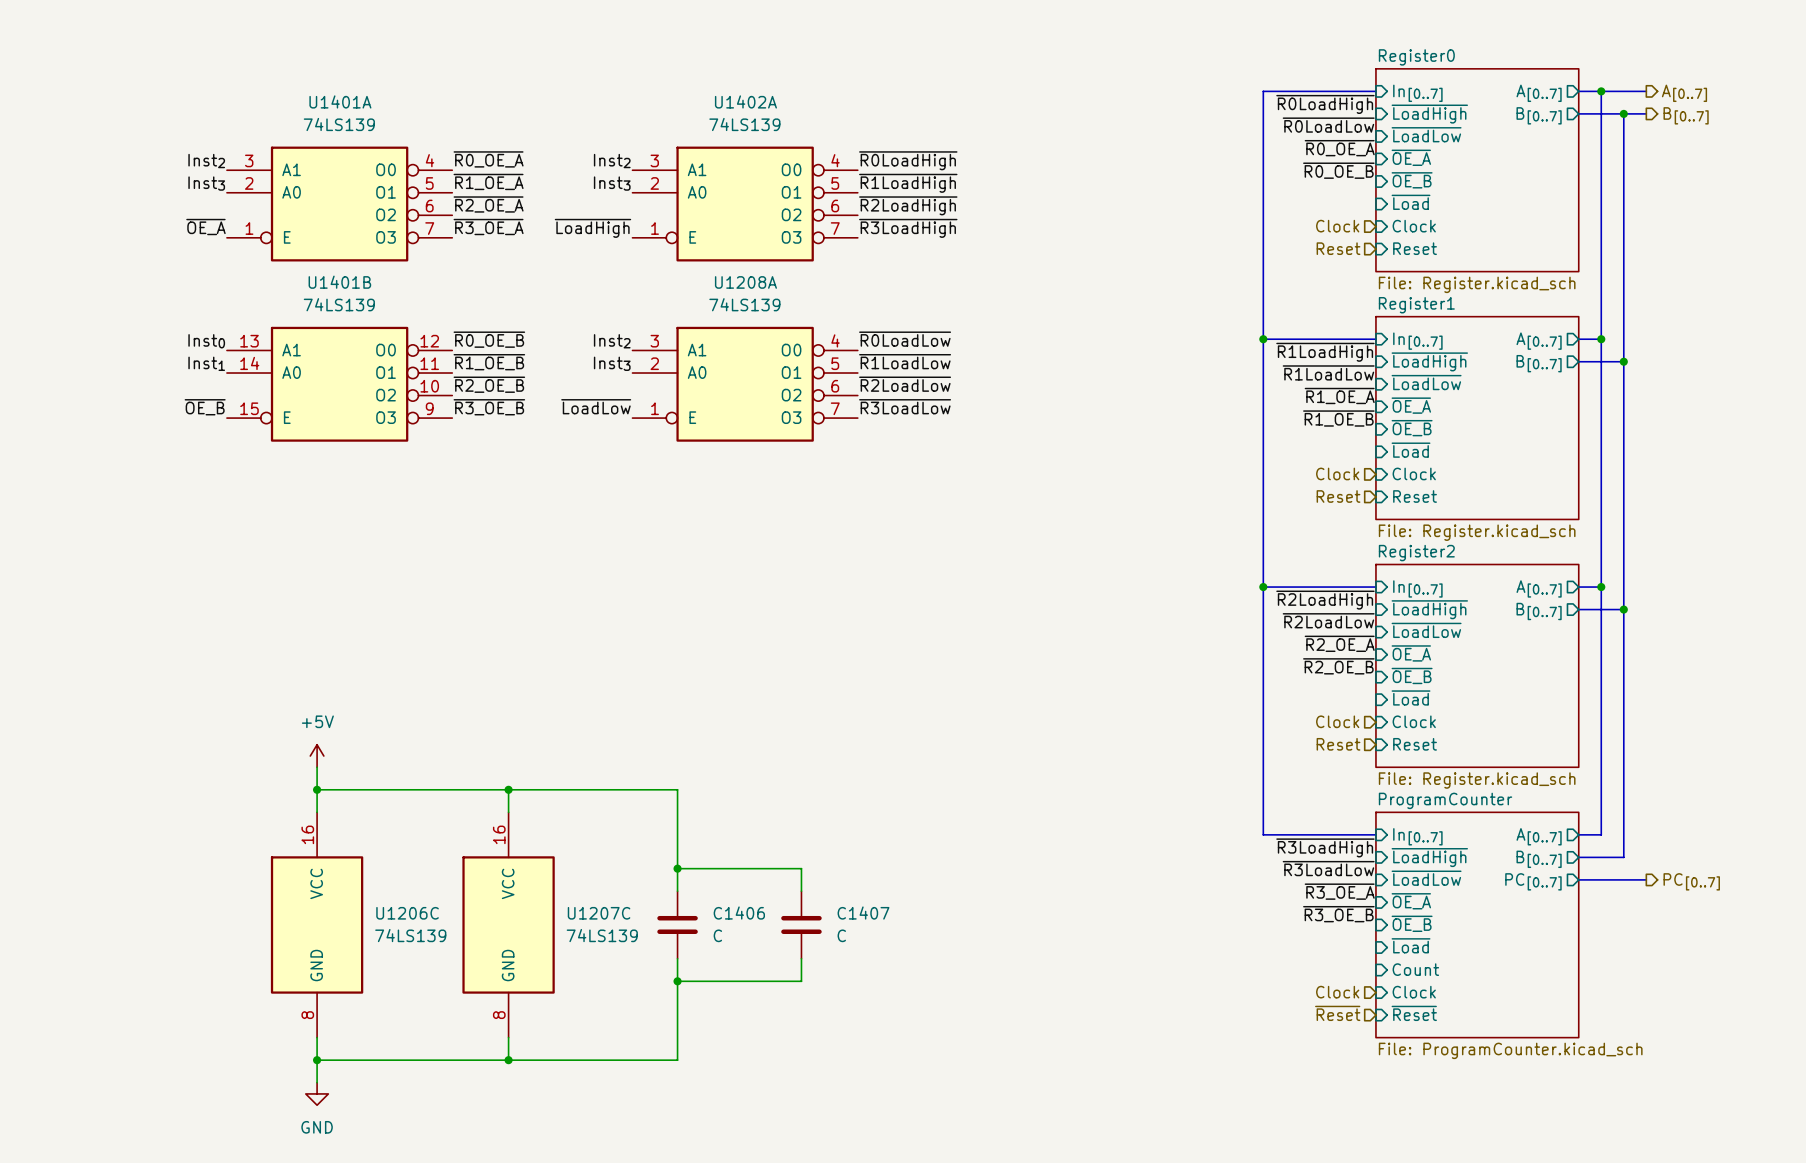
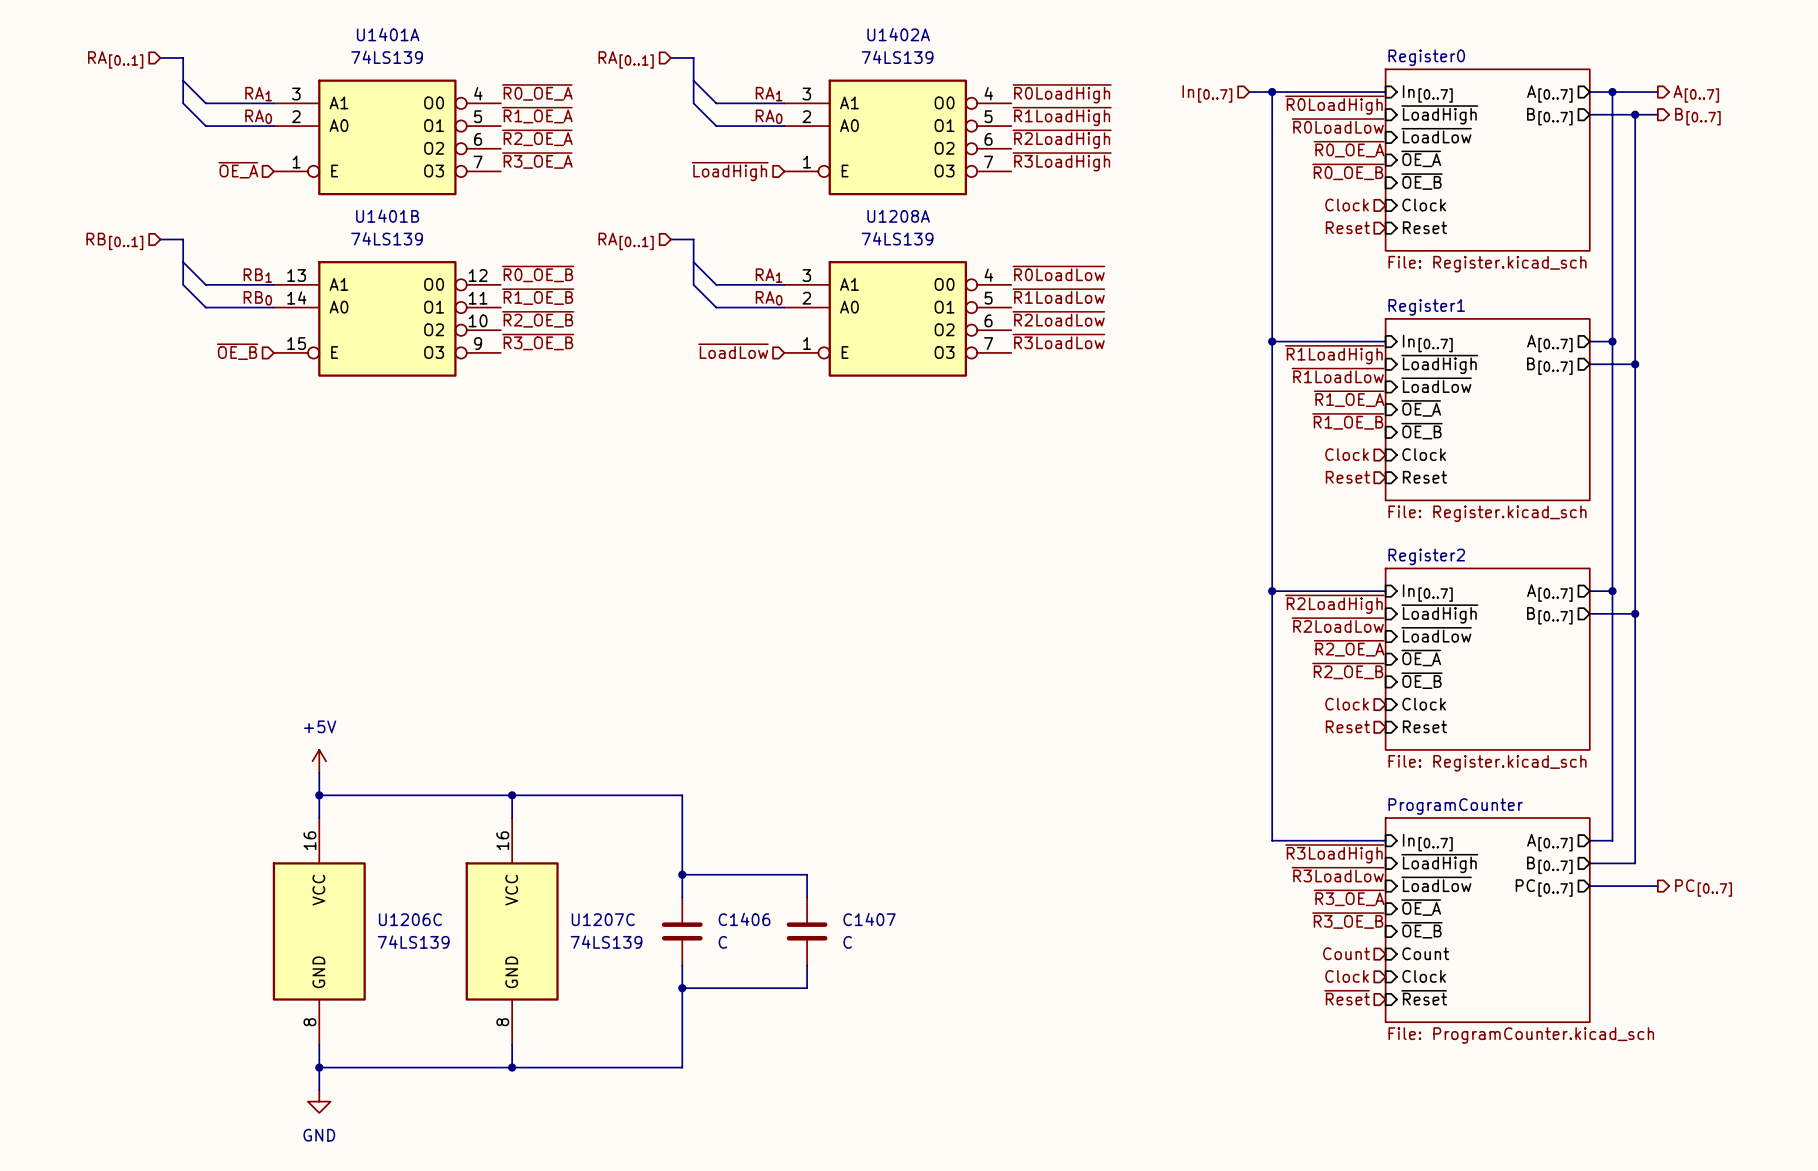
bus: none -> (160, 57) (183, 57) (183, 103)
bus: none -> (670, 57) (693, 57) (693, 103)
hierarchical label: none -> RA[0..1] (115, 59)
hierarchical label: none -> RA[0..1] (626, 59)
sheet Register0 shape: [1375, 68, 1580, 273] -> [1384, 68, 1591, 252]
wire: none -> (183, 80) (205, 103) (273, 103)
wire: none -> (693, 80) (716, 103) (784, 103)
bus: none -> (1249, 92) (1272, 92)
junction: none -> (1272, 92)
label: none -> RA1 (258, 94)
label: none -> RA1 (769, 94)
hierarchical label: none -> In[0..7] (1207, 93)
wire: none -> (183, 103) (205, 126) (273, 126)
wire: none -> (693, 103) (716, 126) (784, 126)
label: none -> RA0 (258, 116)
label: none -> RA0 (769, 116)
label position: ~{R0_OE_A} (488, 159) -> ~{R0_OE_A} (537, 92)
label position: ~{R0LoadHigh} (908, 160) -> ~{R0LoadHigh} (1062, 93)
label: Inst2 (206, 161) -> none
label: Inst2 (612, 161) -> none
hierarchical label: none -> ~{OE_A} (238, 170)
hierarchical label: none -> ~{LoadHigh} (730, 171)
label position: ~{R1_OE_A} (488, 181) -> ~{R1_OE_A} (537, 115)
label: Inst3 (206, 183) -> none
label: Inst3 (612, 183) -> none
label position: ~{R1LoadHigh} (908, 183) -> ~{R1LoadHigh} (1062, 116)
sheet pin: ~{Load} (1411, 202) -> Clock (1424, 205)
hierarchical label: none -> Clock (1347, 205)
U1401A position: (339, 204) -> (387, 137)
label position: ~{R2_OE_A} (488, 204) -> ~{R2_OE_A} (537, 137)
U1402A position: (745, 204) -> (897, 137)
label position: ~{R2LoadHigh} (908, 205) -> ~{R2LoadHigh} (1062, 139)
hierarchical label: Clock (1337, 226) -> Reset (1347, 227)
sheet pin: Clock (1414, 226) -> Reset (1424, 227)
label: ~{OE_A} (205, 227) -> none
label position: ~{R3_OE_A} (488, 227) -> ~{R3_OE_A} (537, 160)
label: ~{LoadHigh} (592, 228) -> none
label position: ~{R3LoadHigh} (908, 228) -> ~{R3LoadHigh} (1062, 161)
bus: none -> (160, 239) (183, 239) (183, 284)
bus: none -> (670, 239) (693, 239) (693, 284)
hierarchical label: none -> RB[0..1] (114, 241)
hierarchical label: none -> RA[0..1] (626, 241)
hierarchical label: Reset (1338, 248) -> none
sheet pin: Reset (1415, 248) -> none
wire: none -> (183, 262) (205, 284) (273, 284)
wire: none -> (693, 262) (716, 284) (784, 284)
label: none -> RB1 (257, 275)
label: none -> RA1 (769, 275)
wire: none -> (183, 284) (205, 307) (273, 307)
wire: none -> (693, 284) (716, 307) (784, 307)
label: none -> RB0 (257, 298)
label: none -> RA0 (769, 298)
sheet Register1 shape: [1375, 316, 1580, 521] -> [1384, 318, 1591, 502]
label position: ~{R0_OE_B} (489, 339) -> ~{R0_OE_B} (538, 273)
label position: ~{R0LoadLow} (905, 339) -> ~{R0LoadLow} (1058, 273)
label: Inst0 (206, 341) -> none
label: Inst2 (612, 341) -> none
hierarchical label: none -> ~{LoadLow} (733, 351)
hierarchical label: none -> ~{OE_B} (237, 351)
label position: ~{R1LoadLow} (905, 361) -> ~{R1LoadLow} (1058, 296)
label position: ~{R1_OE_B} (489, 362) -> ~{R1_OE_B} (538, 296)
label: Inst1 (206, 363) -> none
label: Inst3 (612, 363) -> none
U1401B position: (339, 384) -> (387, 318)
label position: ~{R2_OE_B} (489, 384) -> ~{R2_OE_B} (538, 319)
U1208A position: (745, 384) -> (897, 318)
label position: ~{R2LoadLow} (905, 384) -> ~{R2LoadLow} (1058, 318)
label: ~{LoadLow} (596, 406) -> none
label position: ~{R3LoadLow} (905, 406) -> ~{R3LoadLow} (1058, 341)
label: ~{OE_B} (205, 407) -> none
label position: ~{R3_OE_B} (489, 407) -> ~{R3_OE_B} (538, 342)
sheet pin: ~{Load} (1411, 450) -> Clock (1424, 454)
hierarchical label: none -> Clock (1347, 454)
hierarchical label: Clock (1337, 473) -> Reset (1347, 477)
sheet pin: Clock (1414, 473) -> Reset (1424, 477)
hierarchical label: Reset (1338, 496) -> none
sheet pin: Reset (1415, 496) -> none
sheet Register2 shape: [1375, 563, 1580, 768] -> [1384, 567, 1591, 751]
sheet pin: ~{Load} (1411, 697) -> Clock (1424, 704)
hierarchical label: none -> Clock (1347, 704)
hierarchical label: Clock (1337, 721) -> Reset (1347, 726)
sheet pin: Clock (1414, 721) -> Reset (1424, 726)
hierarchical label: Reset (1338, 744) -> none
sheet pin: Reset (1415, 744) -> none
sheet ProgramCounter: none -> File: ProgramCounter.kicad_sch (1487, 920)
sheet ProgramCounter: File: ProgramCounter.kicad_sch (1477, 924) -> none
sheet pin: ~{Load} (1411, 945) -> Count (1425, 953)
hierarchical label: none -> Count (1346, 953)
hierarchical label: none -> Clock (1347, 976)
sheet pin: Count (1415, 969) -> Clock (1424, 976)
hierarchical label: Clock (1337, 992) -> ~{Reset} (1347, 997)
sheet pin: Clock (1414, 992) -> ~{Reset} (1424, 997)
hierarchical label: ~{Reset} (1337, 1013) -> none
sheet pin: ~{Reset} (1414, 1013) -> none

